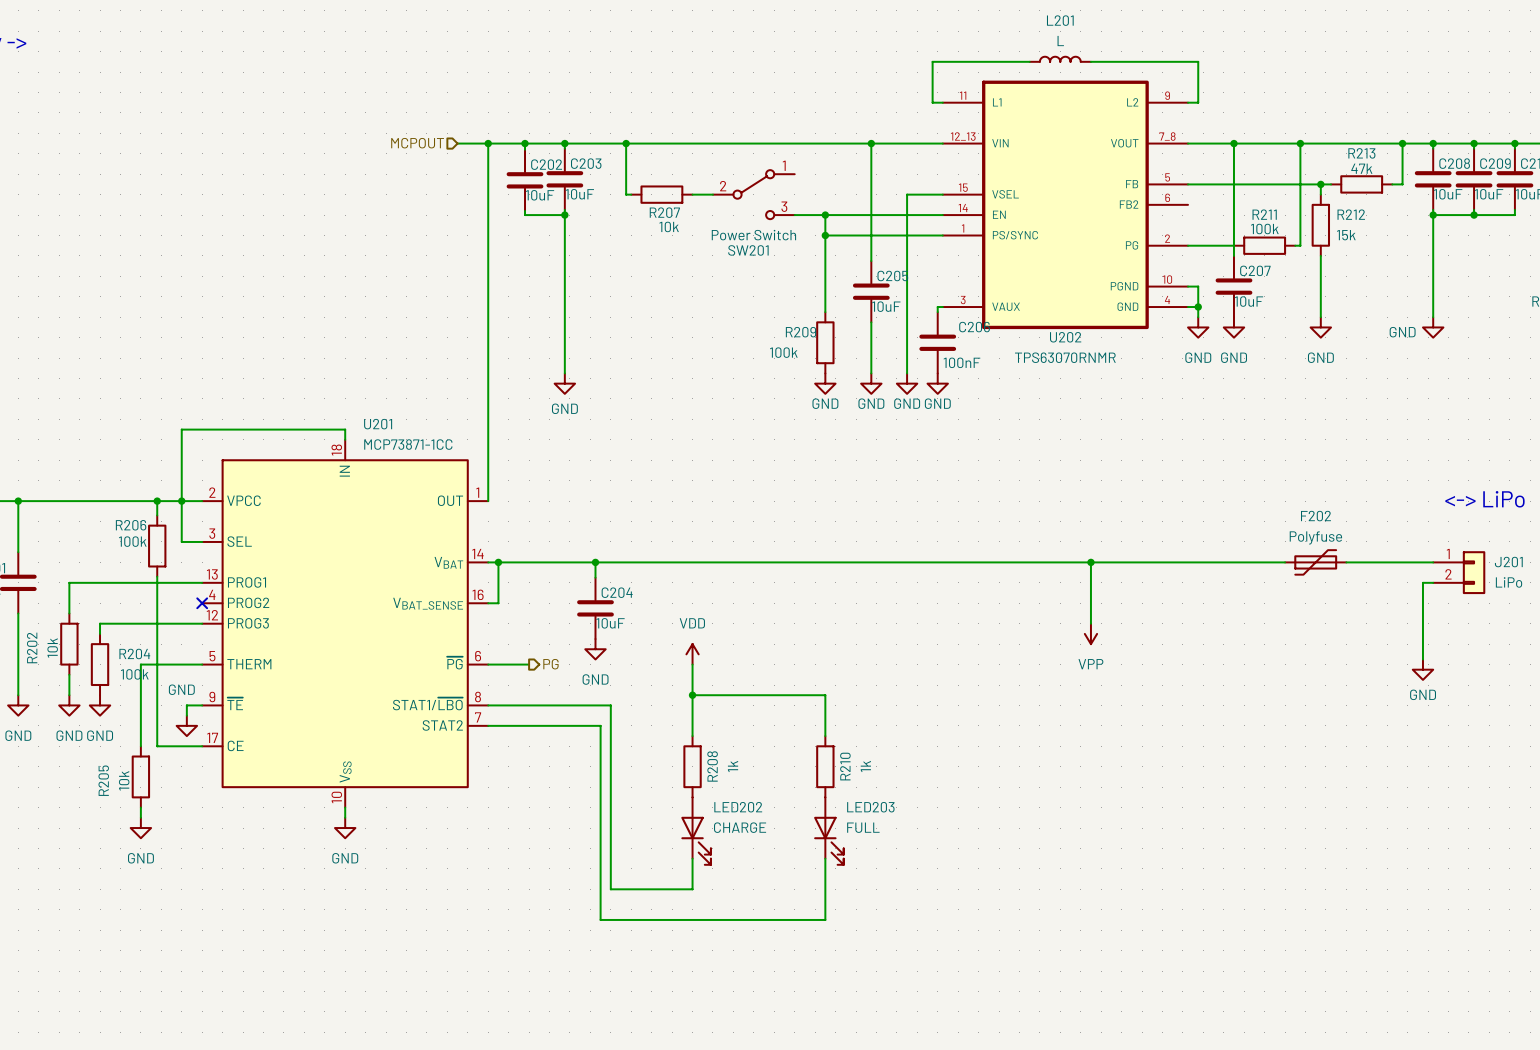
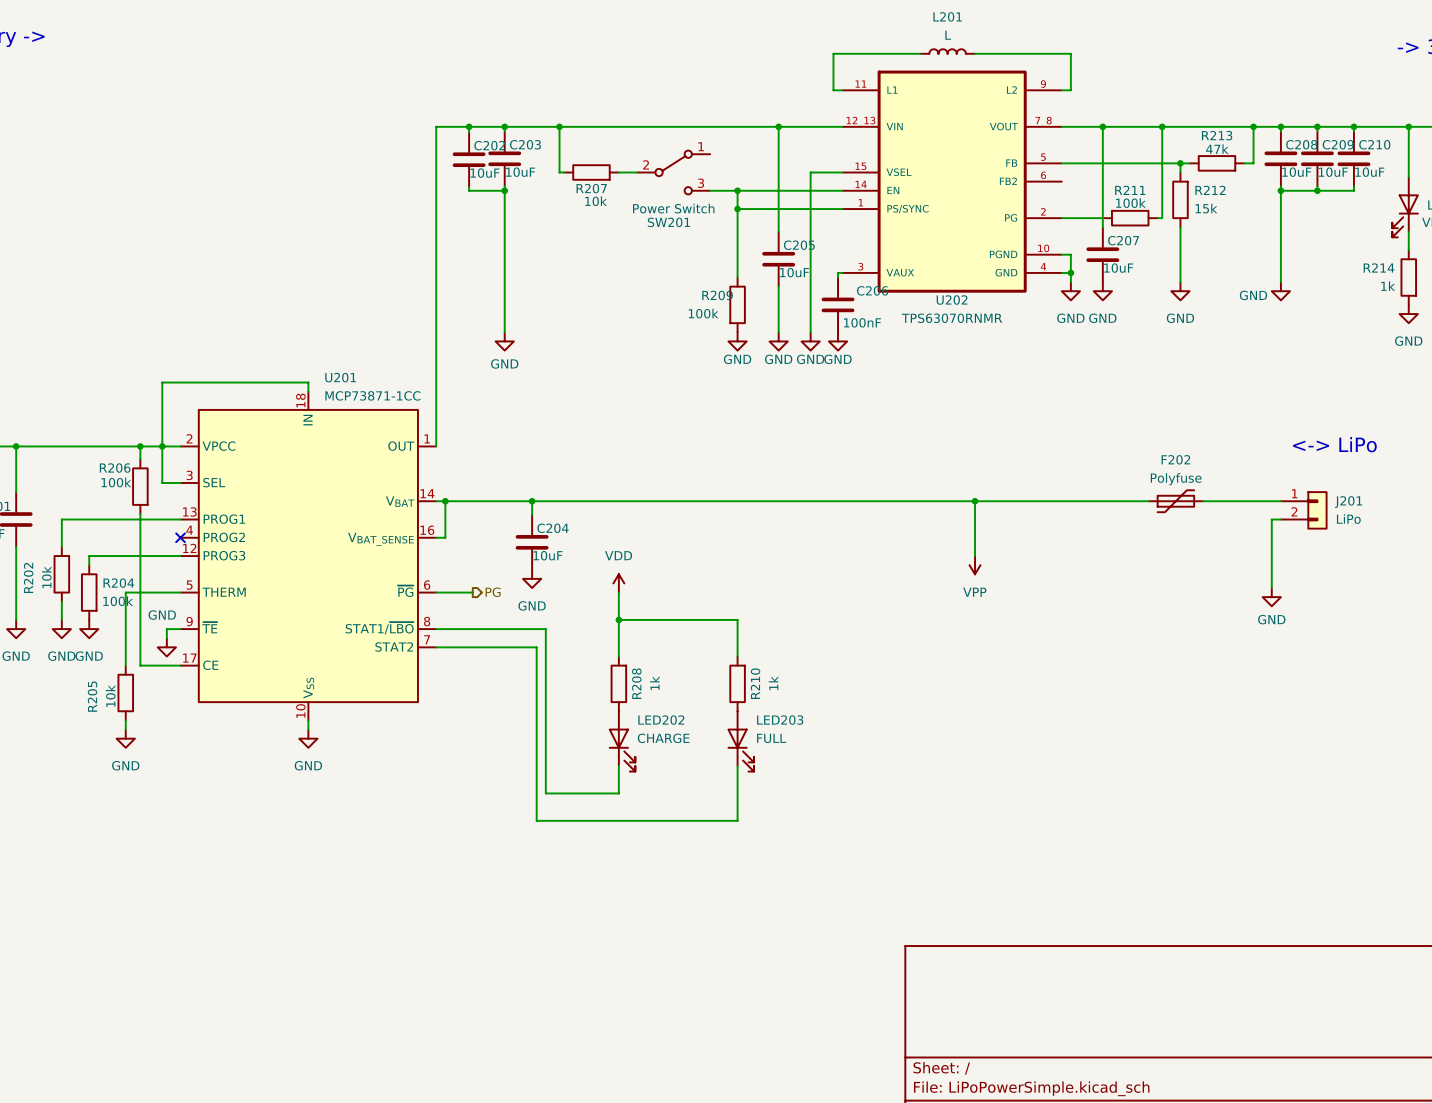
hierarchical label: MCPOUT (417, 143) -> none
wire: (457, 143) (488, 143) -> none
junction: (488, 143) -> none

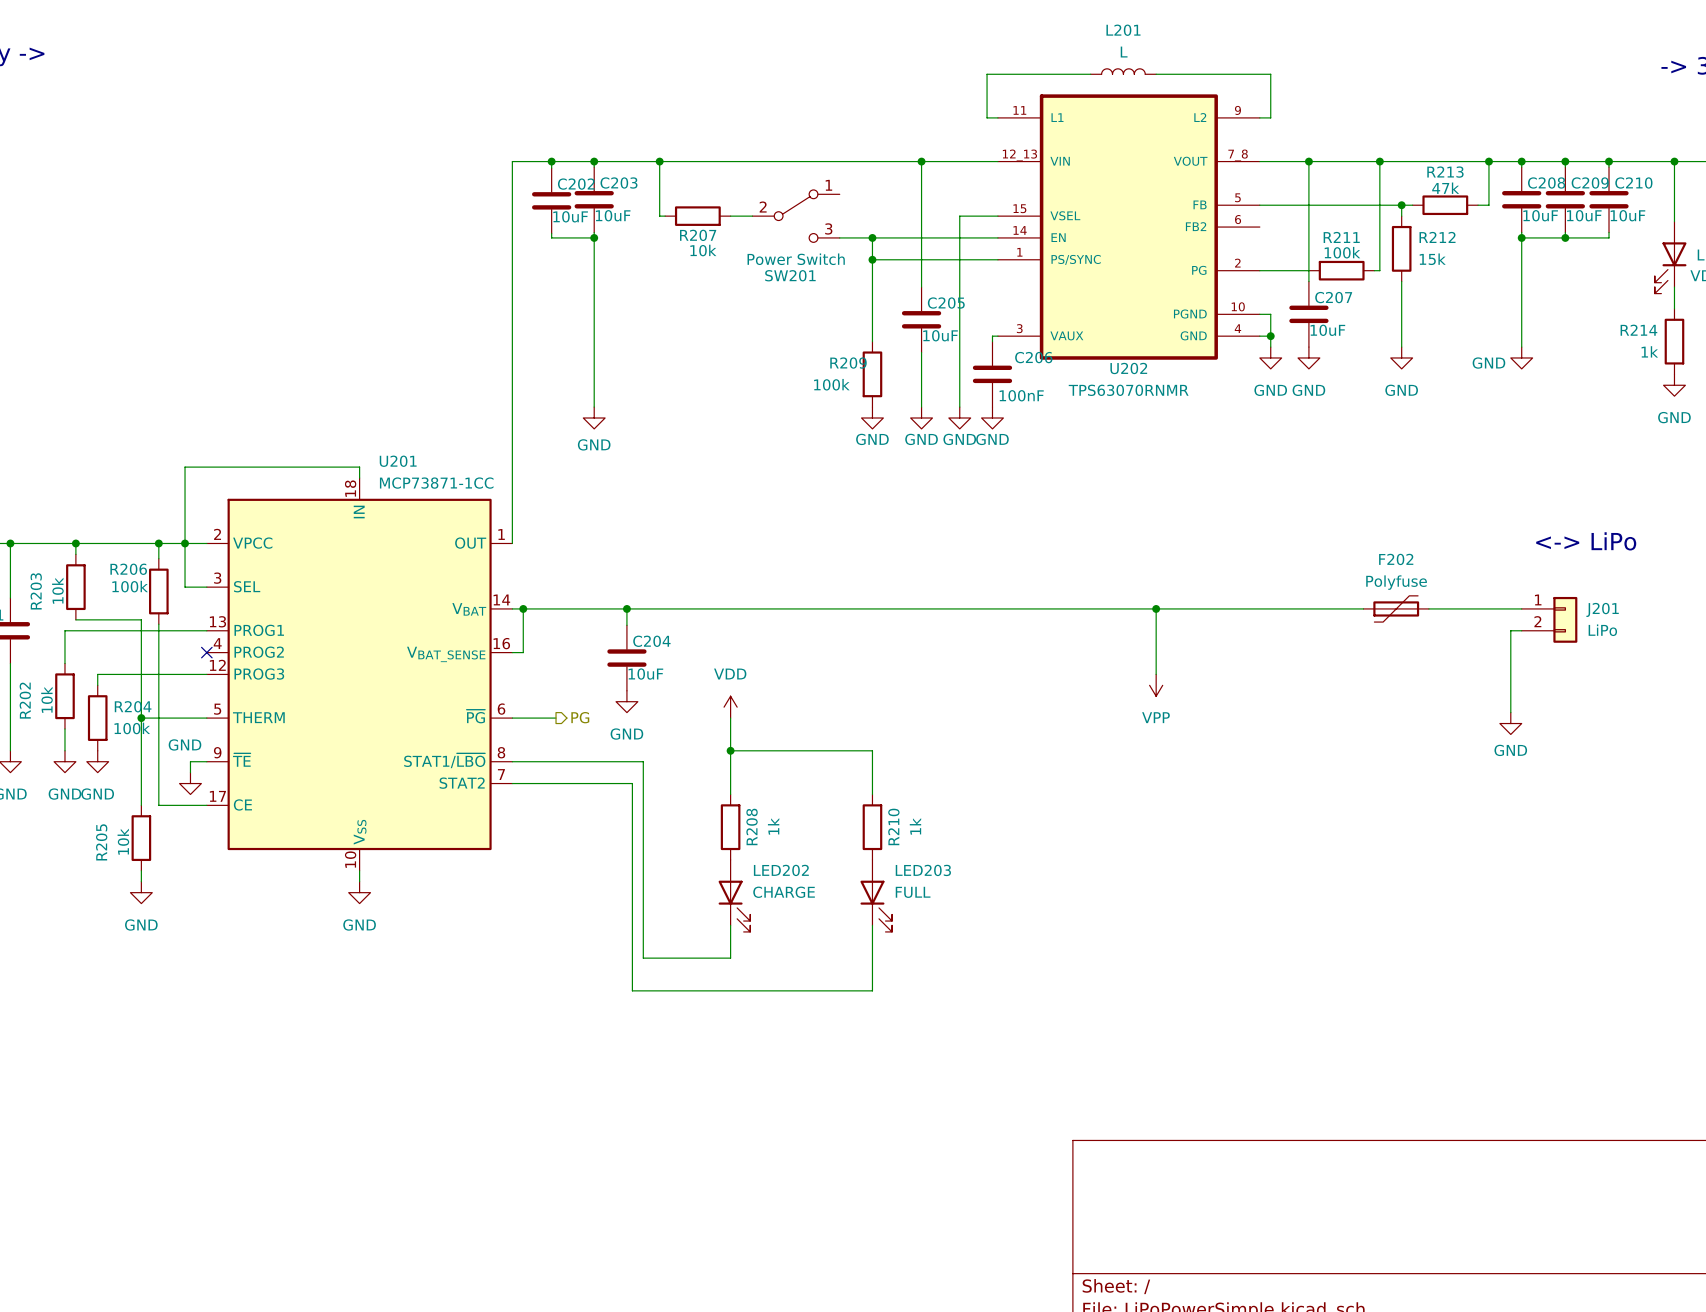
wire: none -> (75, 543) (75, 554)
junction: none -> (75, 543)
R203: none -> 10k (75, 587)
wire: none -> (75, 619) (141, 619) (141, 718)
junction: none -> (141, 718)

